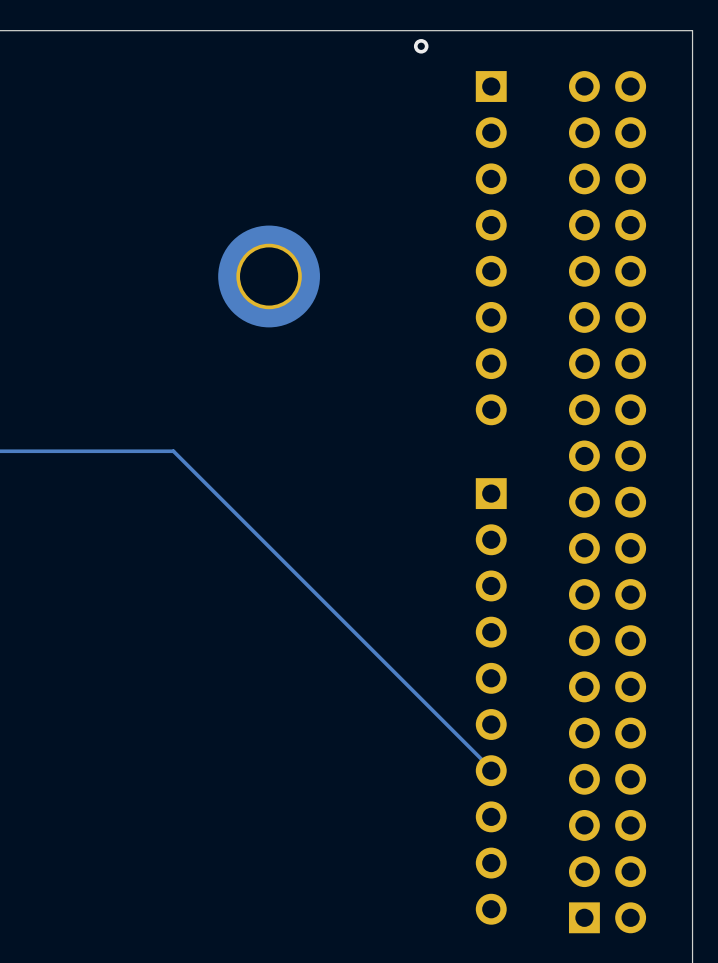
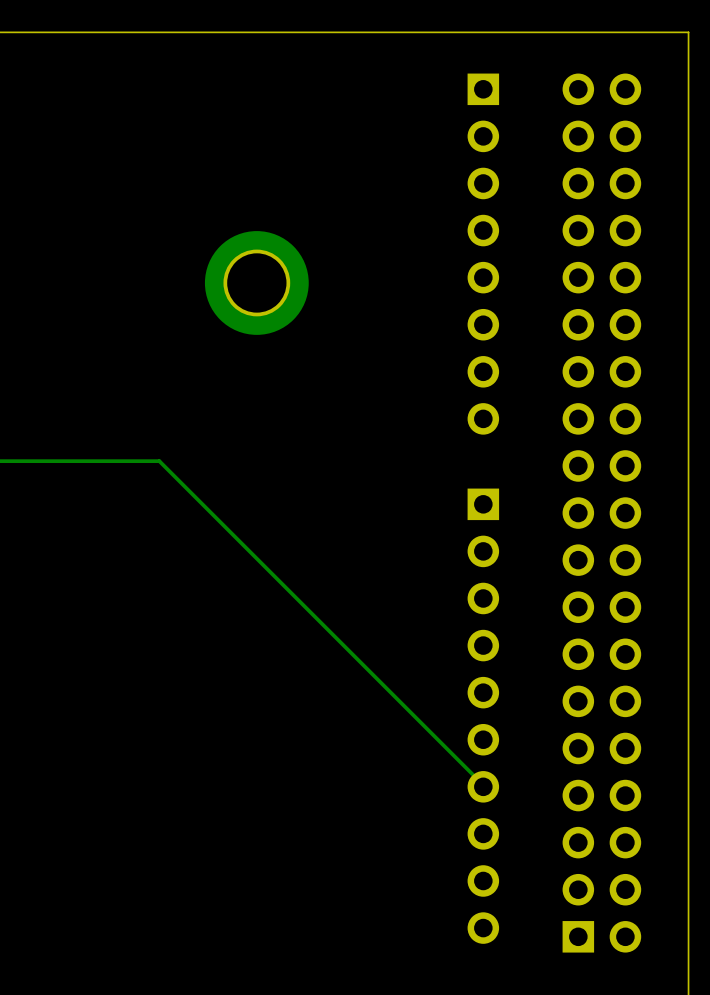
via: (421, 46) -> none

